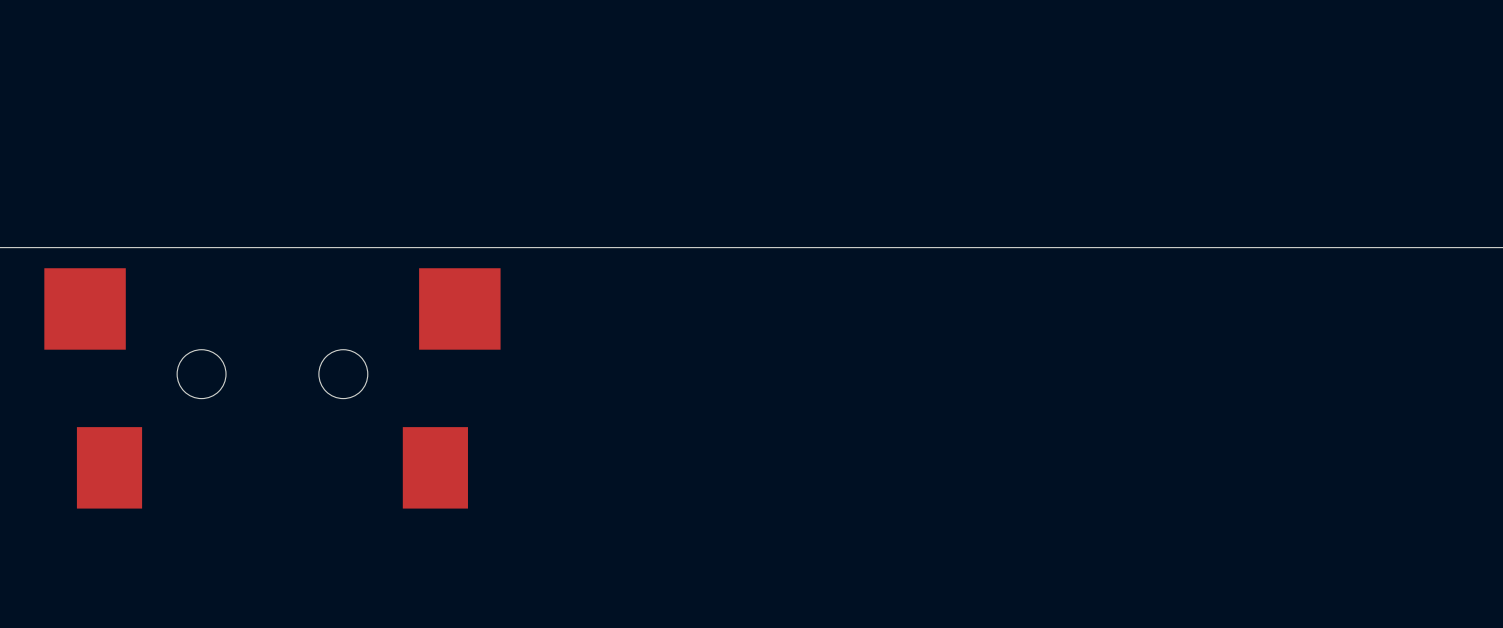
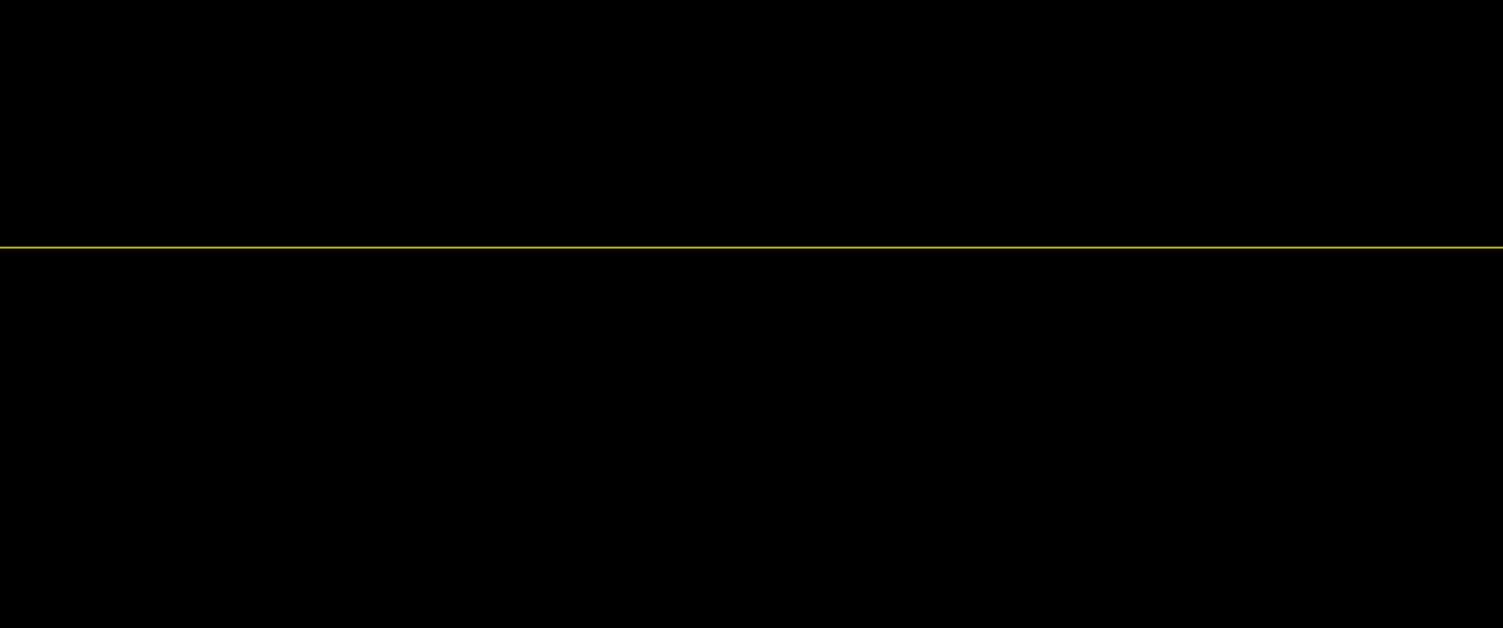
part: (272, 388) -> none

